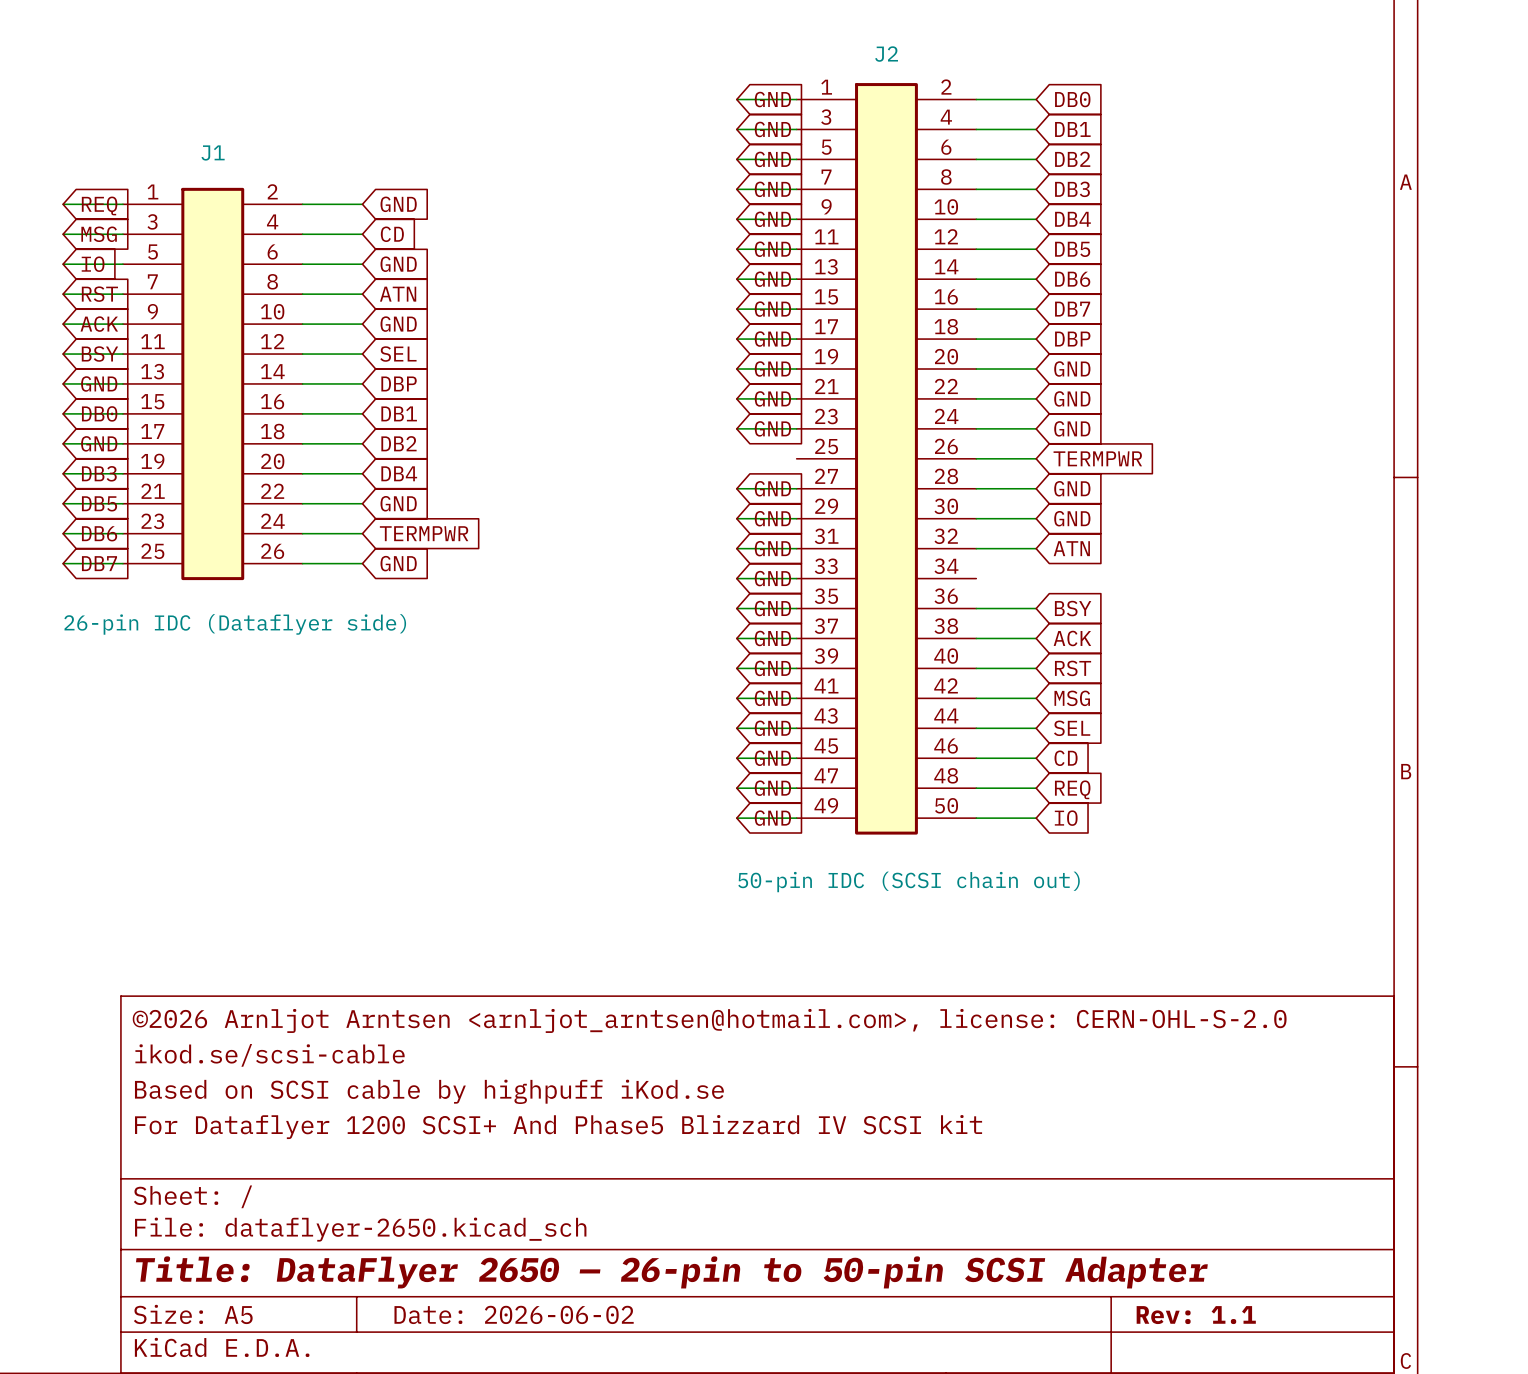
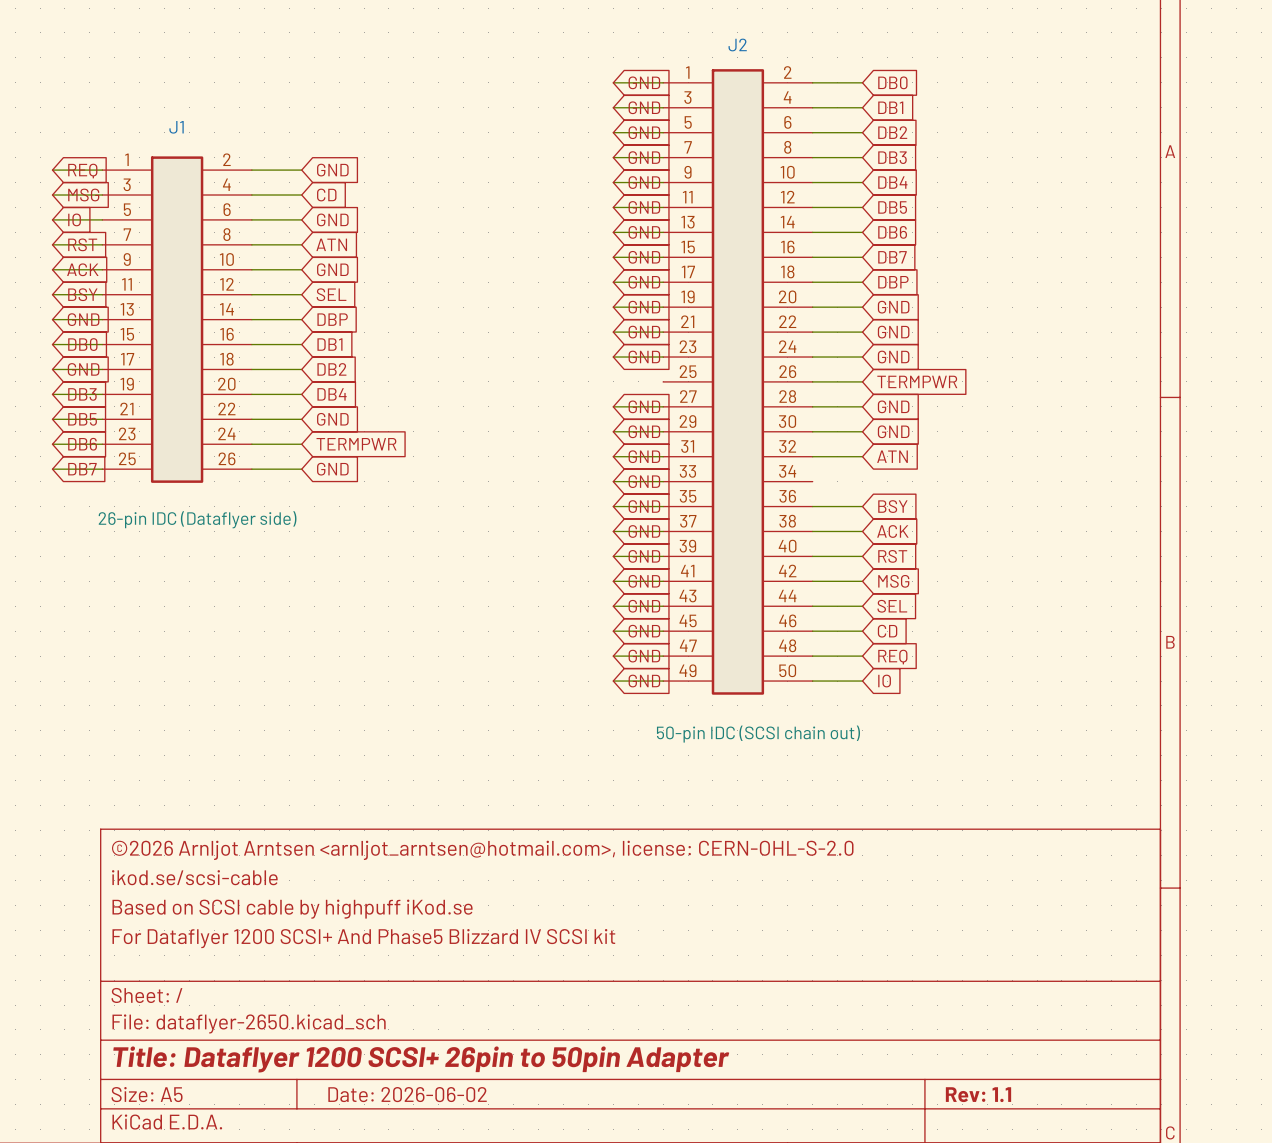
title block: Title: DataFlyer 2650 — 26-pin to 50-pin SCSI Adapter (671, 1272) -> Title: Dataflyer 1200 SCSI+ 26pin to 50pin Adapter (421, 1059)

